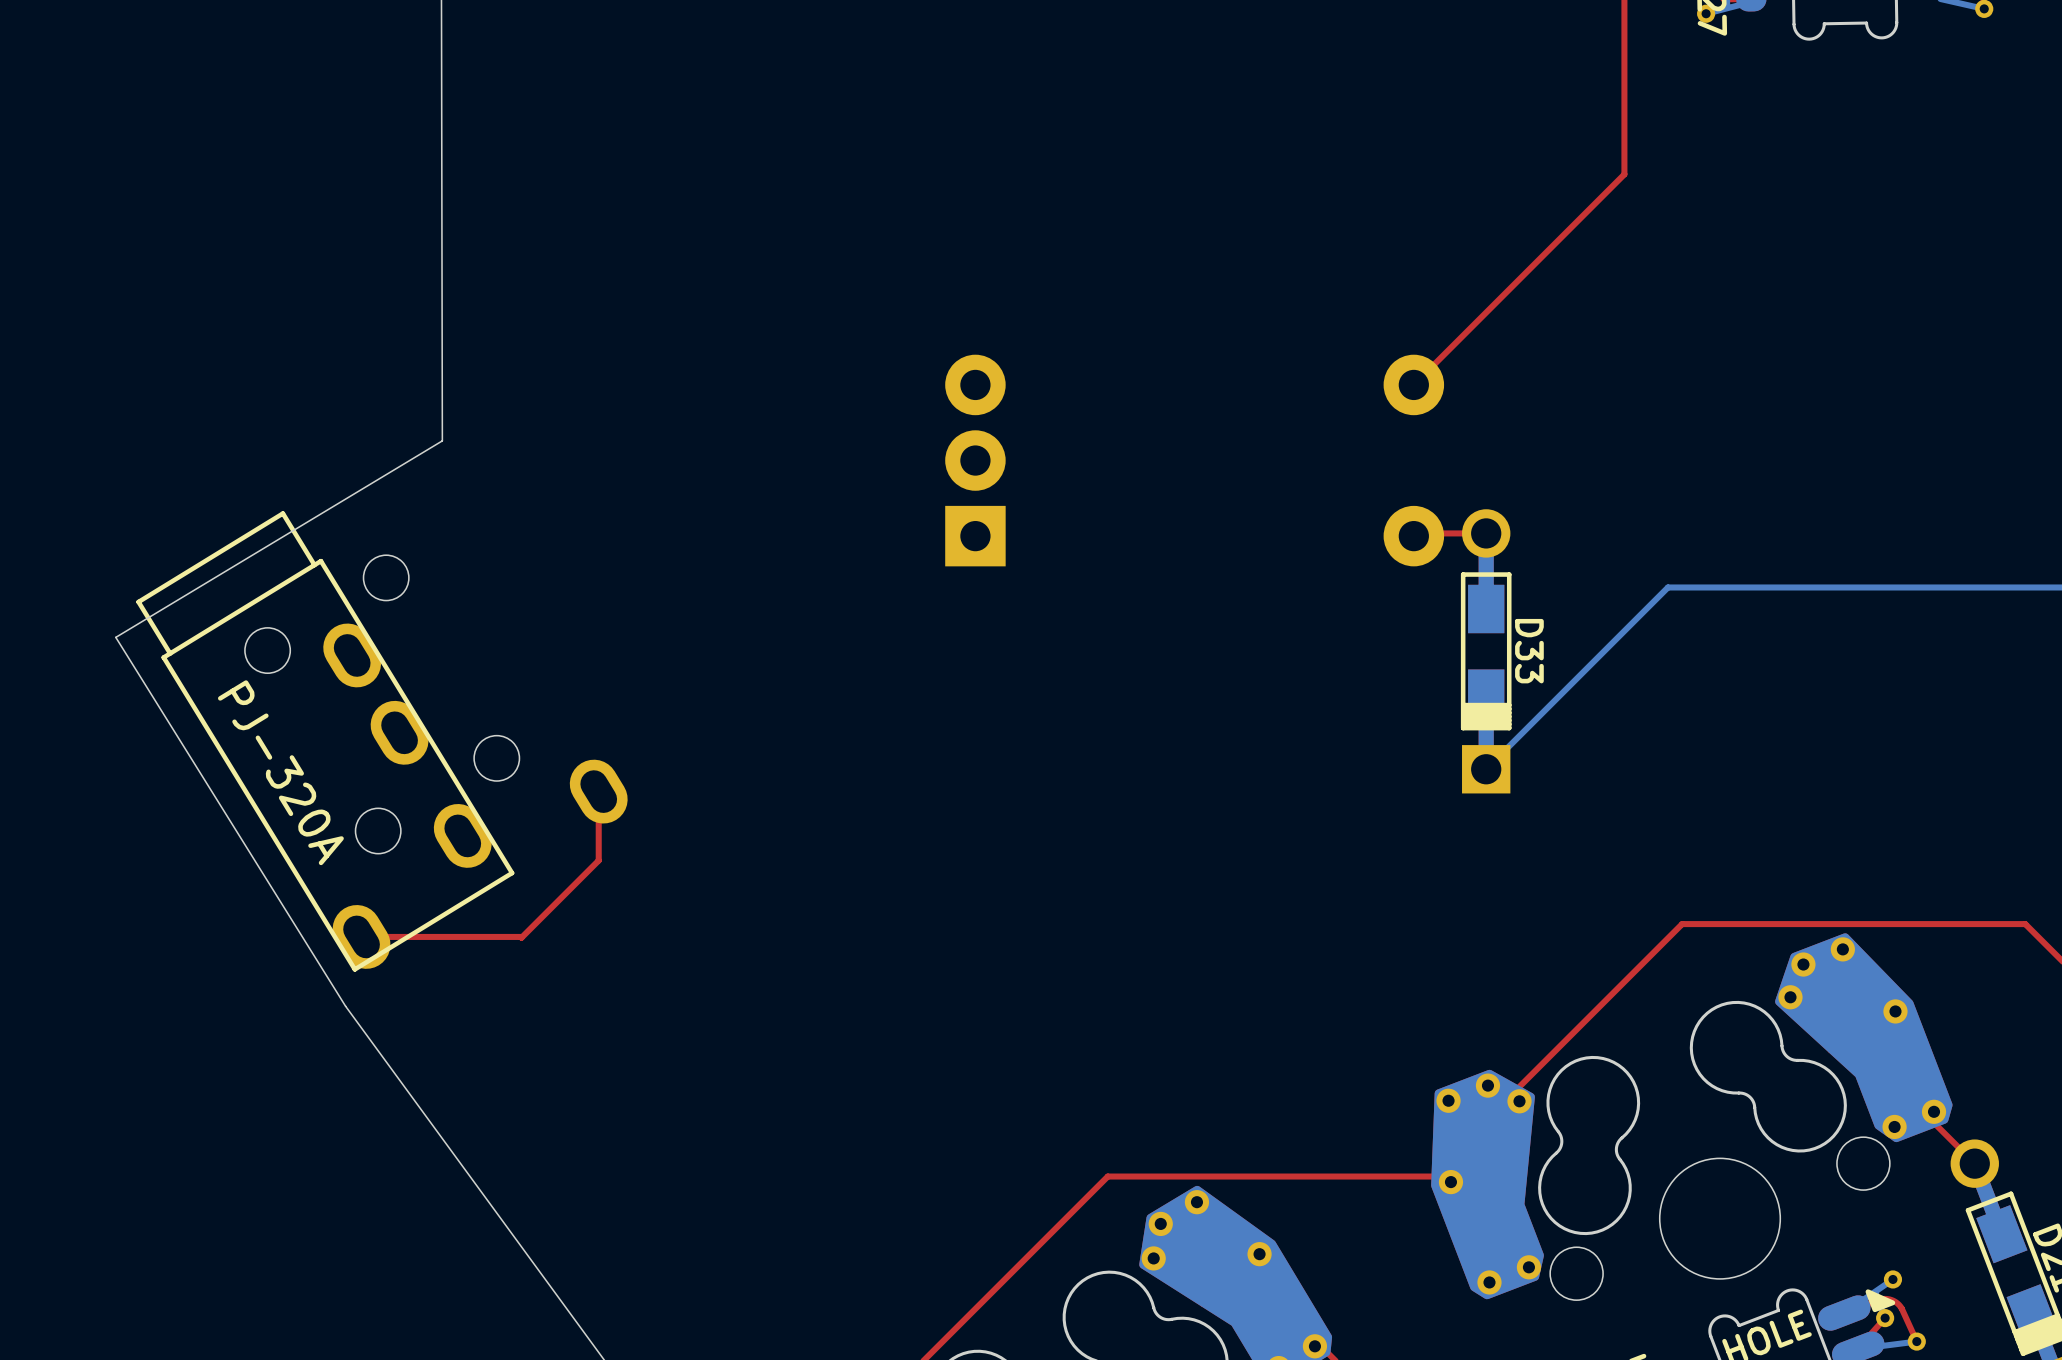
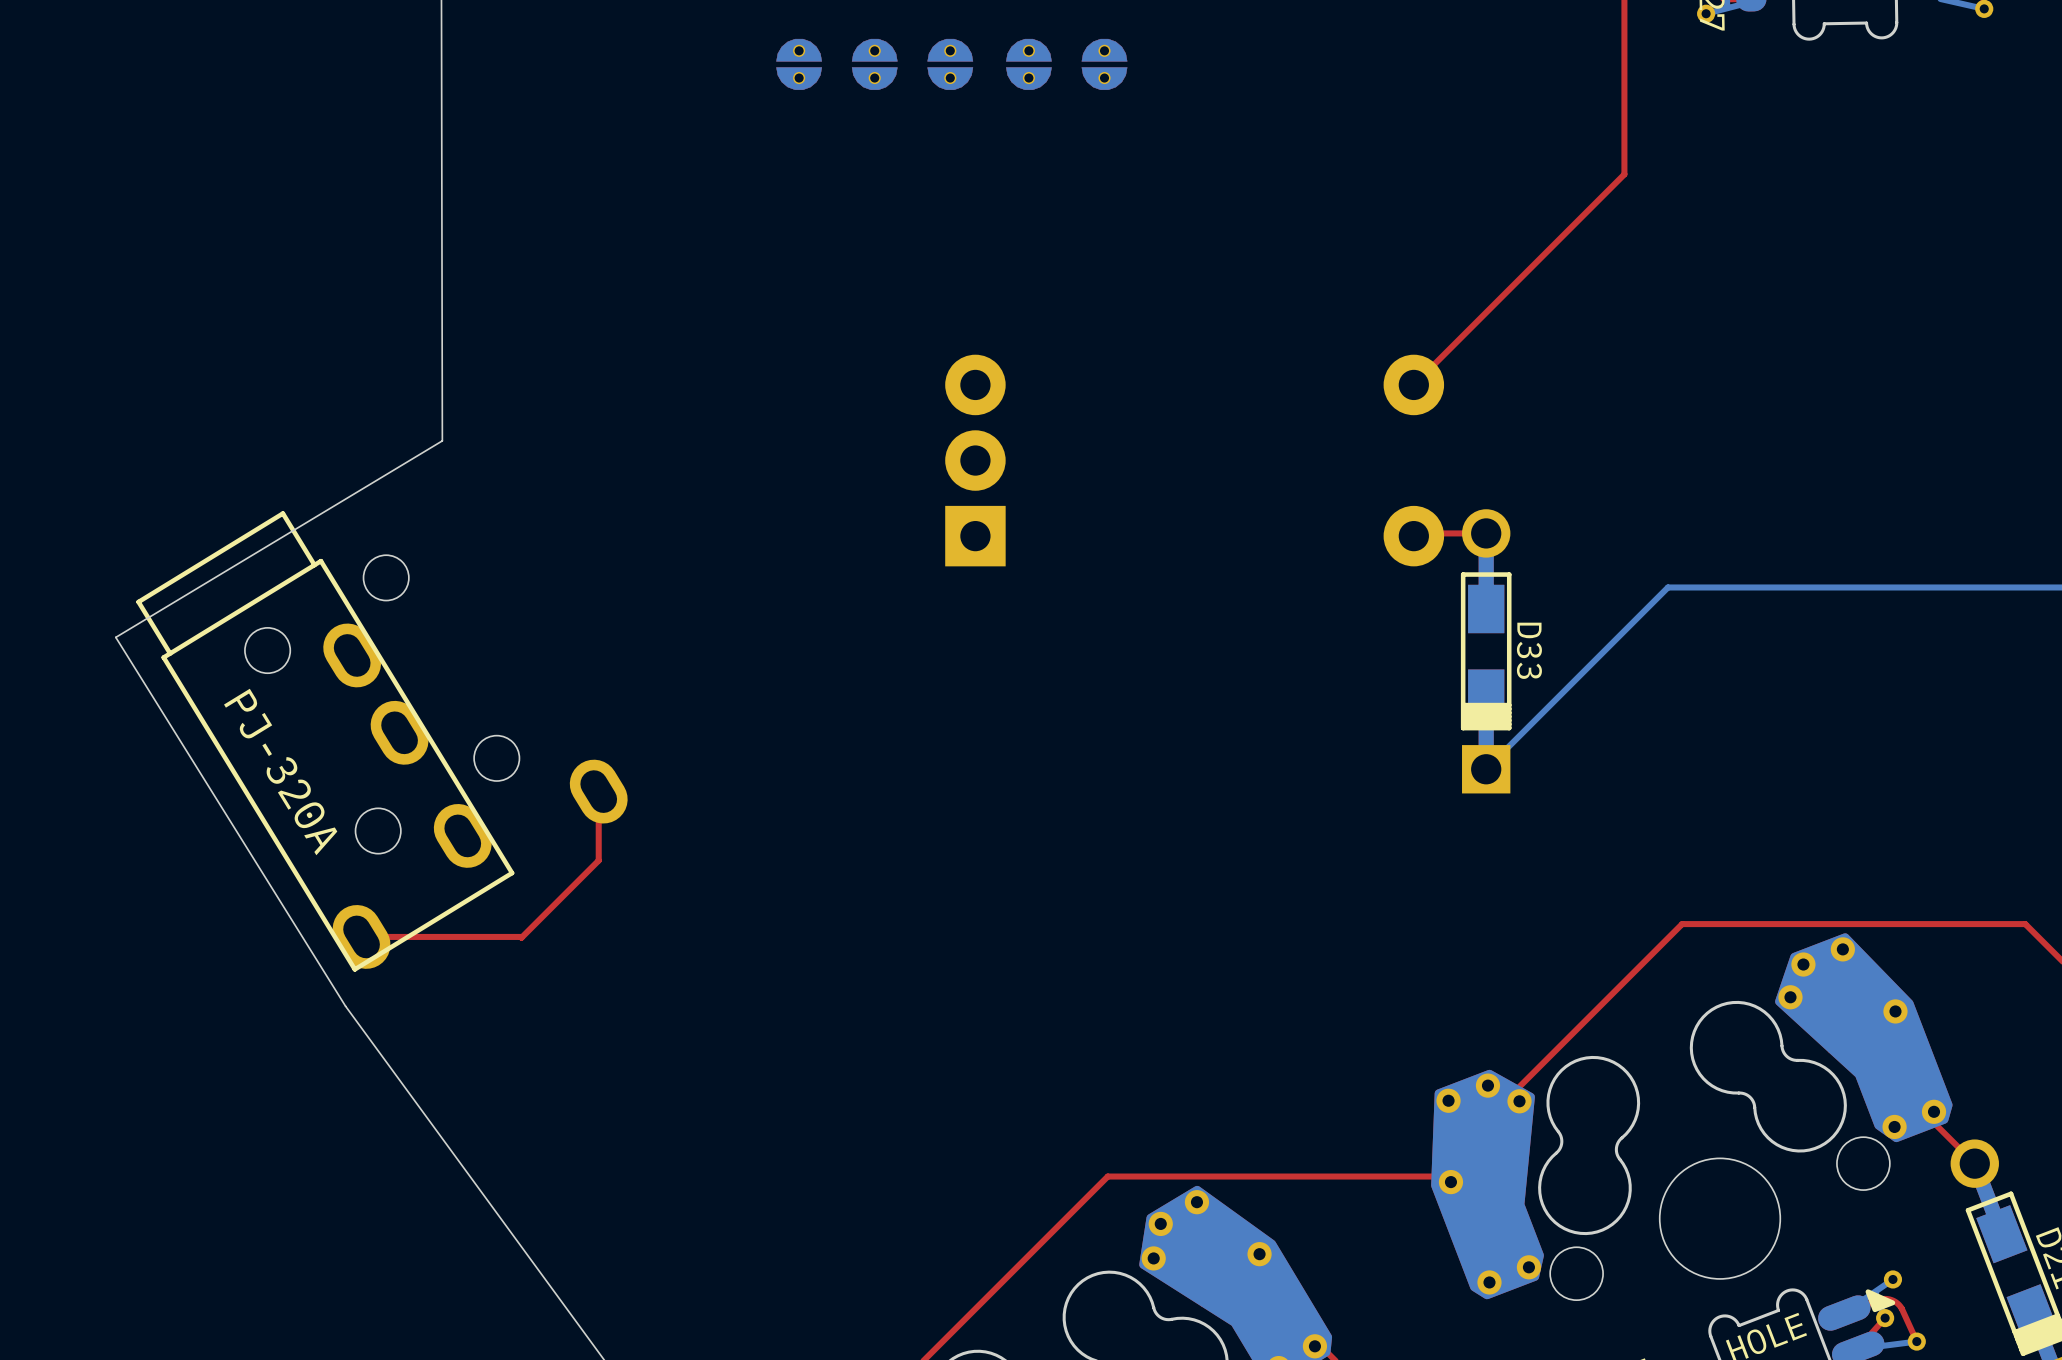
part: none -> (799, 64)
part: none -> (874, 64)
part: none -> (950, 64)
part: none -> (1028, 64)
part: none -> (1104, 64)

